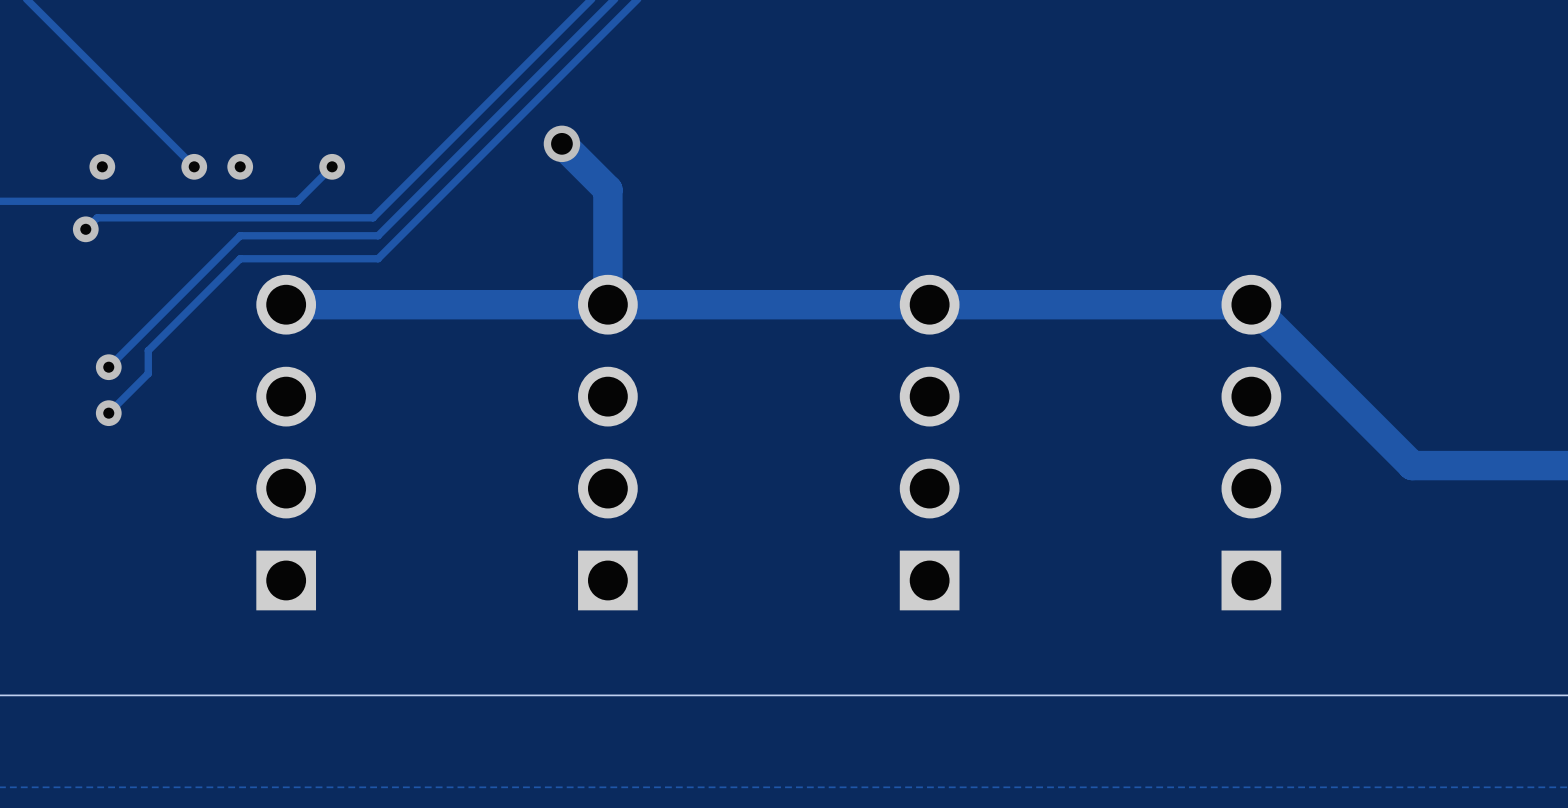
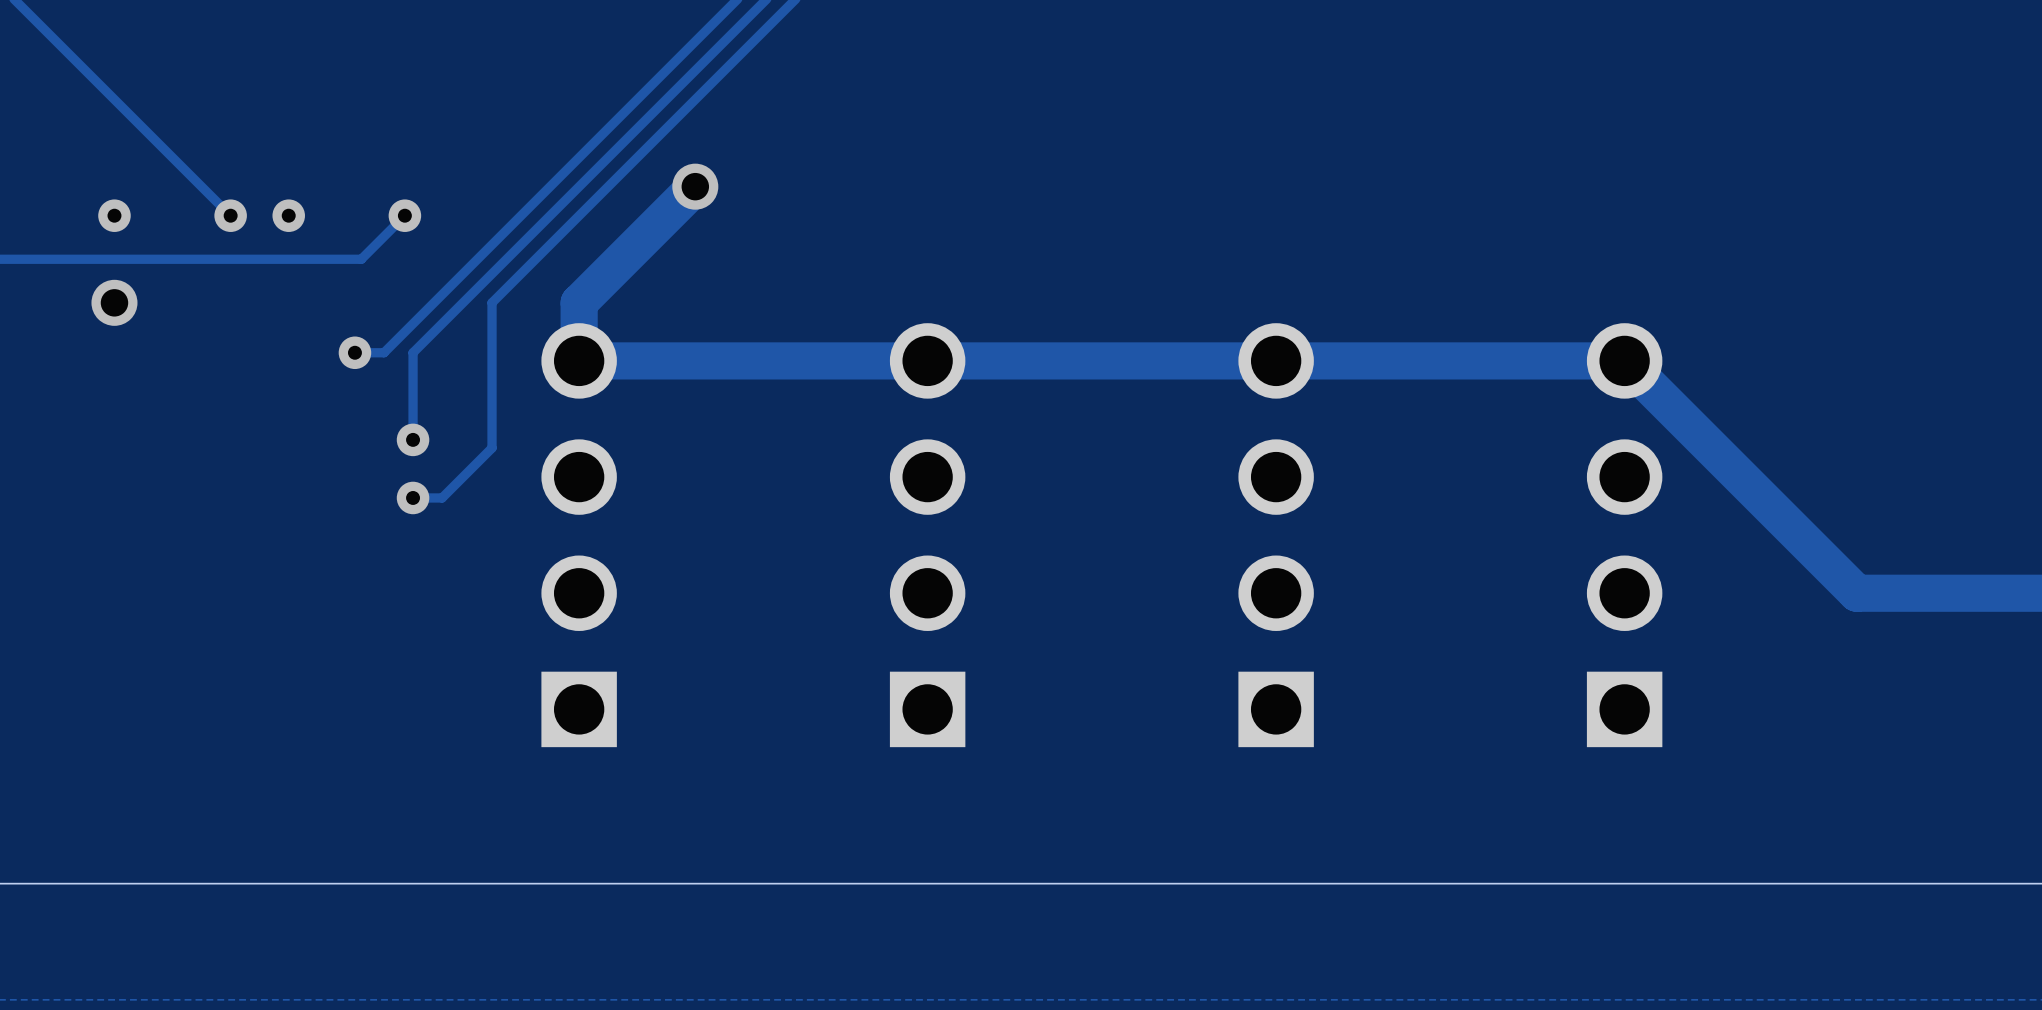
track: (561, 143) (607, 189) (607, 304) -> none
via size: [72, 216, 99, 243] -> [91, 279, 138, 326]
track: (373, 217) (97, 217) (85, 229) -> (456, 280) (384, 352) (354, 352)
track: (378, 235) (240, 235) (108, 367) -> (462, 302) (413, 352) (413, 439)
track: (401, 235) (378, 258) (240, 258) (148, 350) (148, 373) (108, 413) -> (492, 302) (492, 448) (442, 497) (413, 497)
via: none -> (354, 352)
track: (286, 304) (1251, 304) (1412, 465) (1481, 465) -> (695, 186) (579, 302) (579, 360) (1624, 360) (1856, 593)
via: none -> (413, 439)
via: (108, 367) -> none
via: none -> (413, 497)
via: (108, 413) -> none
part: none -> (579, 535)
part: none -> (927, 535)
part: none -> (1276, 535)
part: (286, 442) -> none
part: (607, 442) -> none
part: (929, 442) -> none
part position: (1251, 442) -> (1624, 535)

